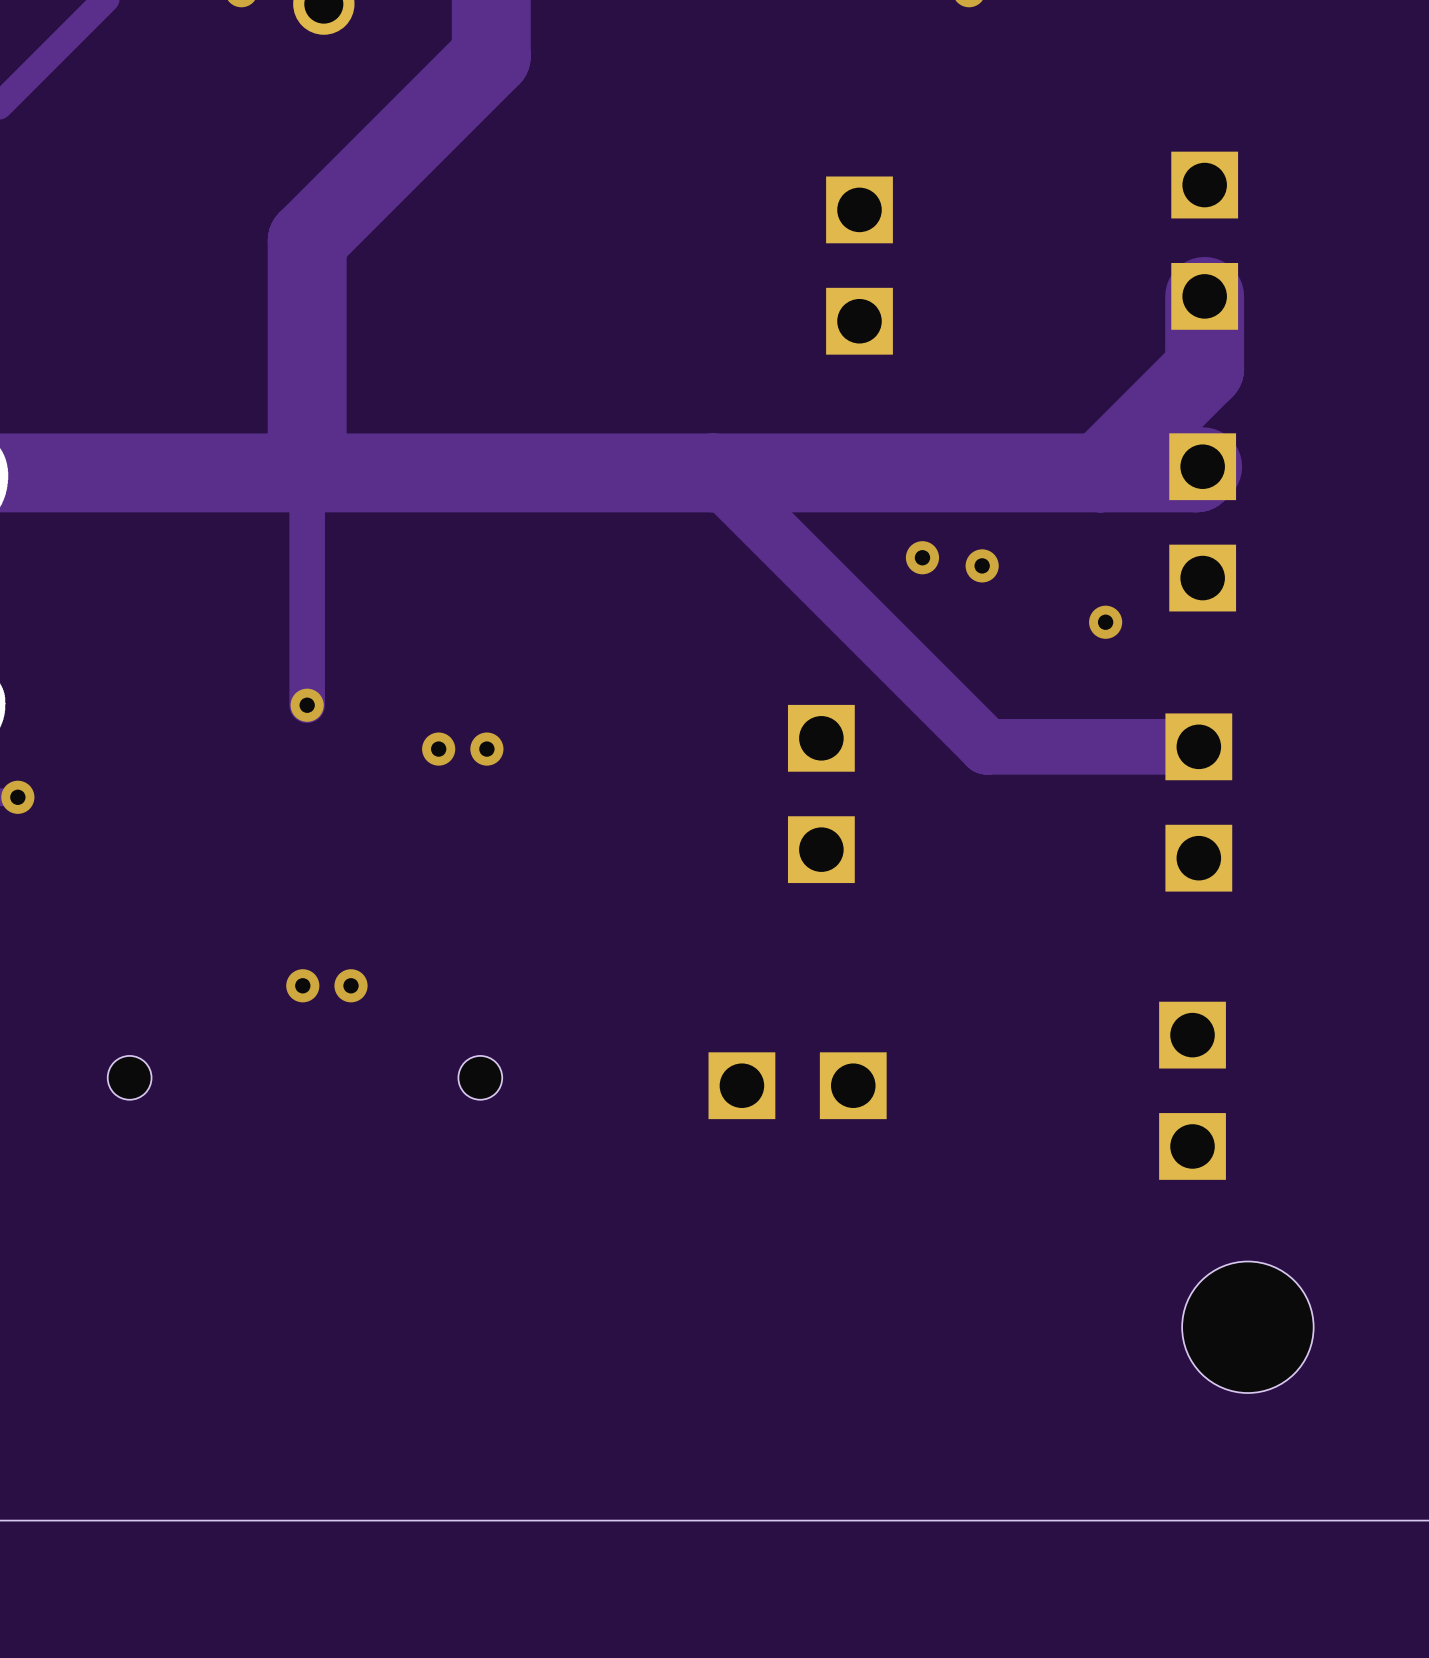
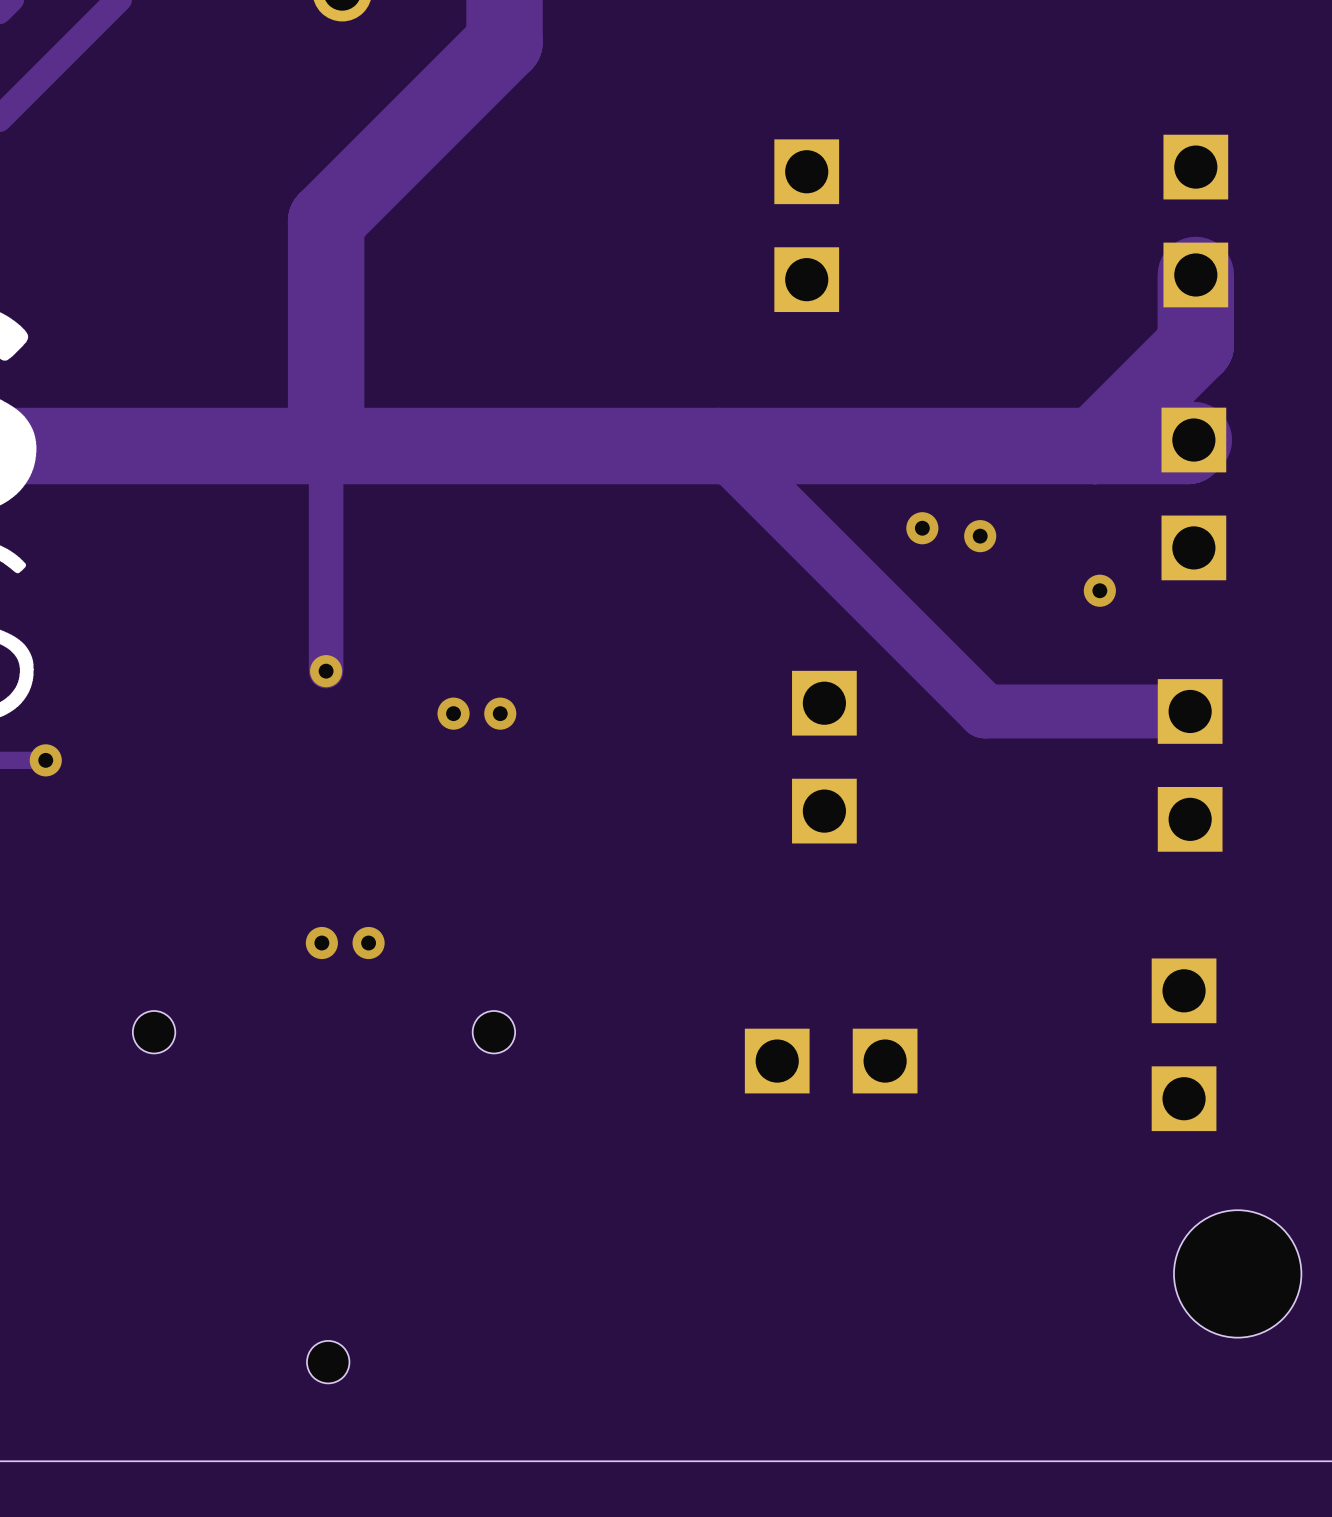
part position: (859, 265) -> (806, 225)
part position: (797, 1085) -> (831, 1061)
hole: none -> (328, 1362)

